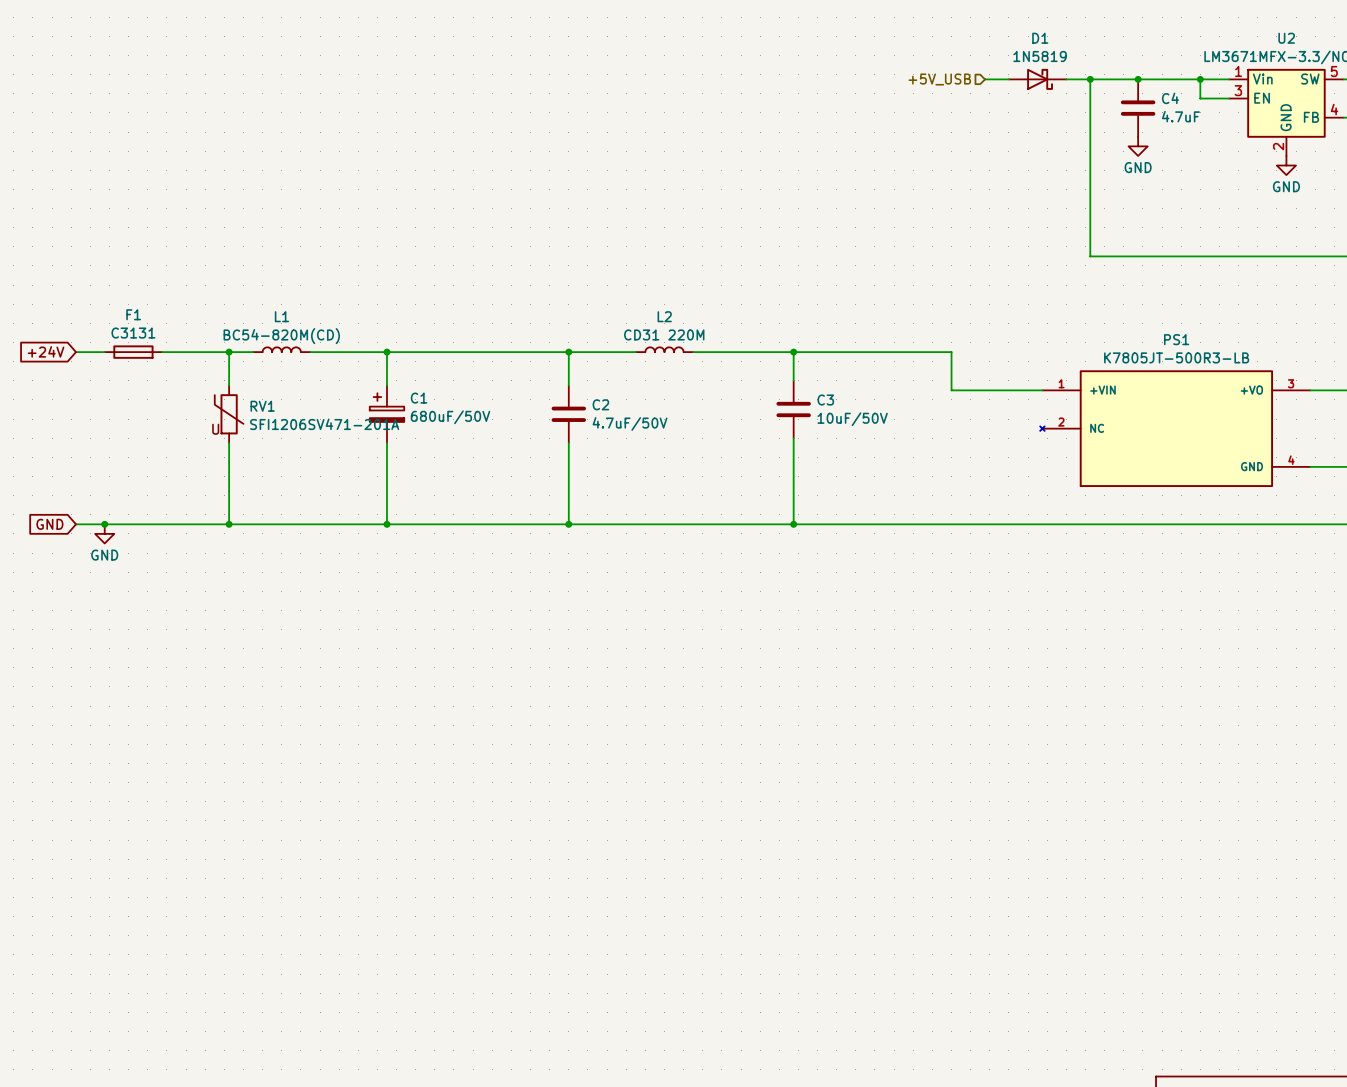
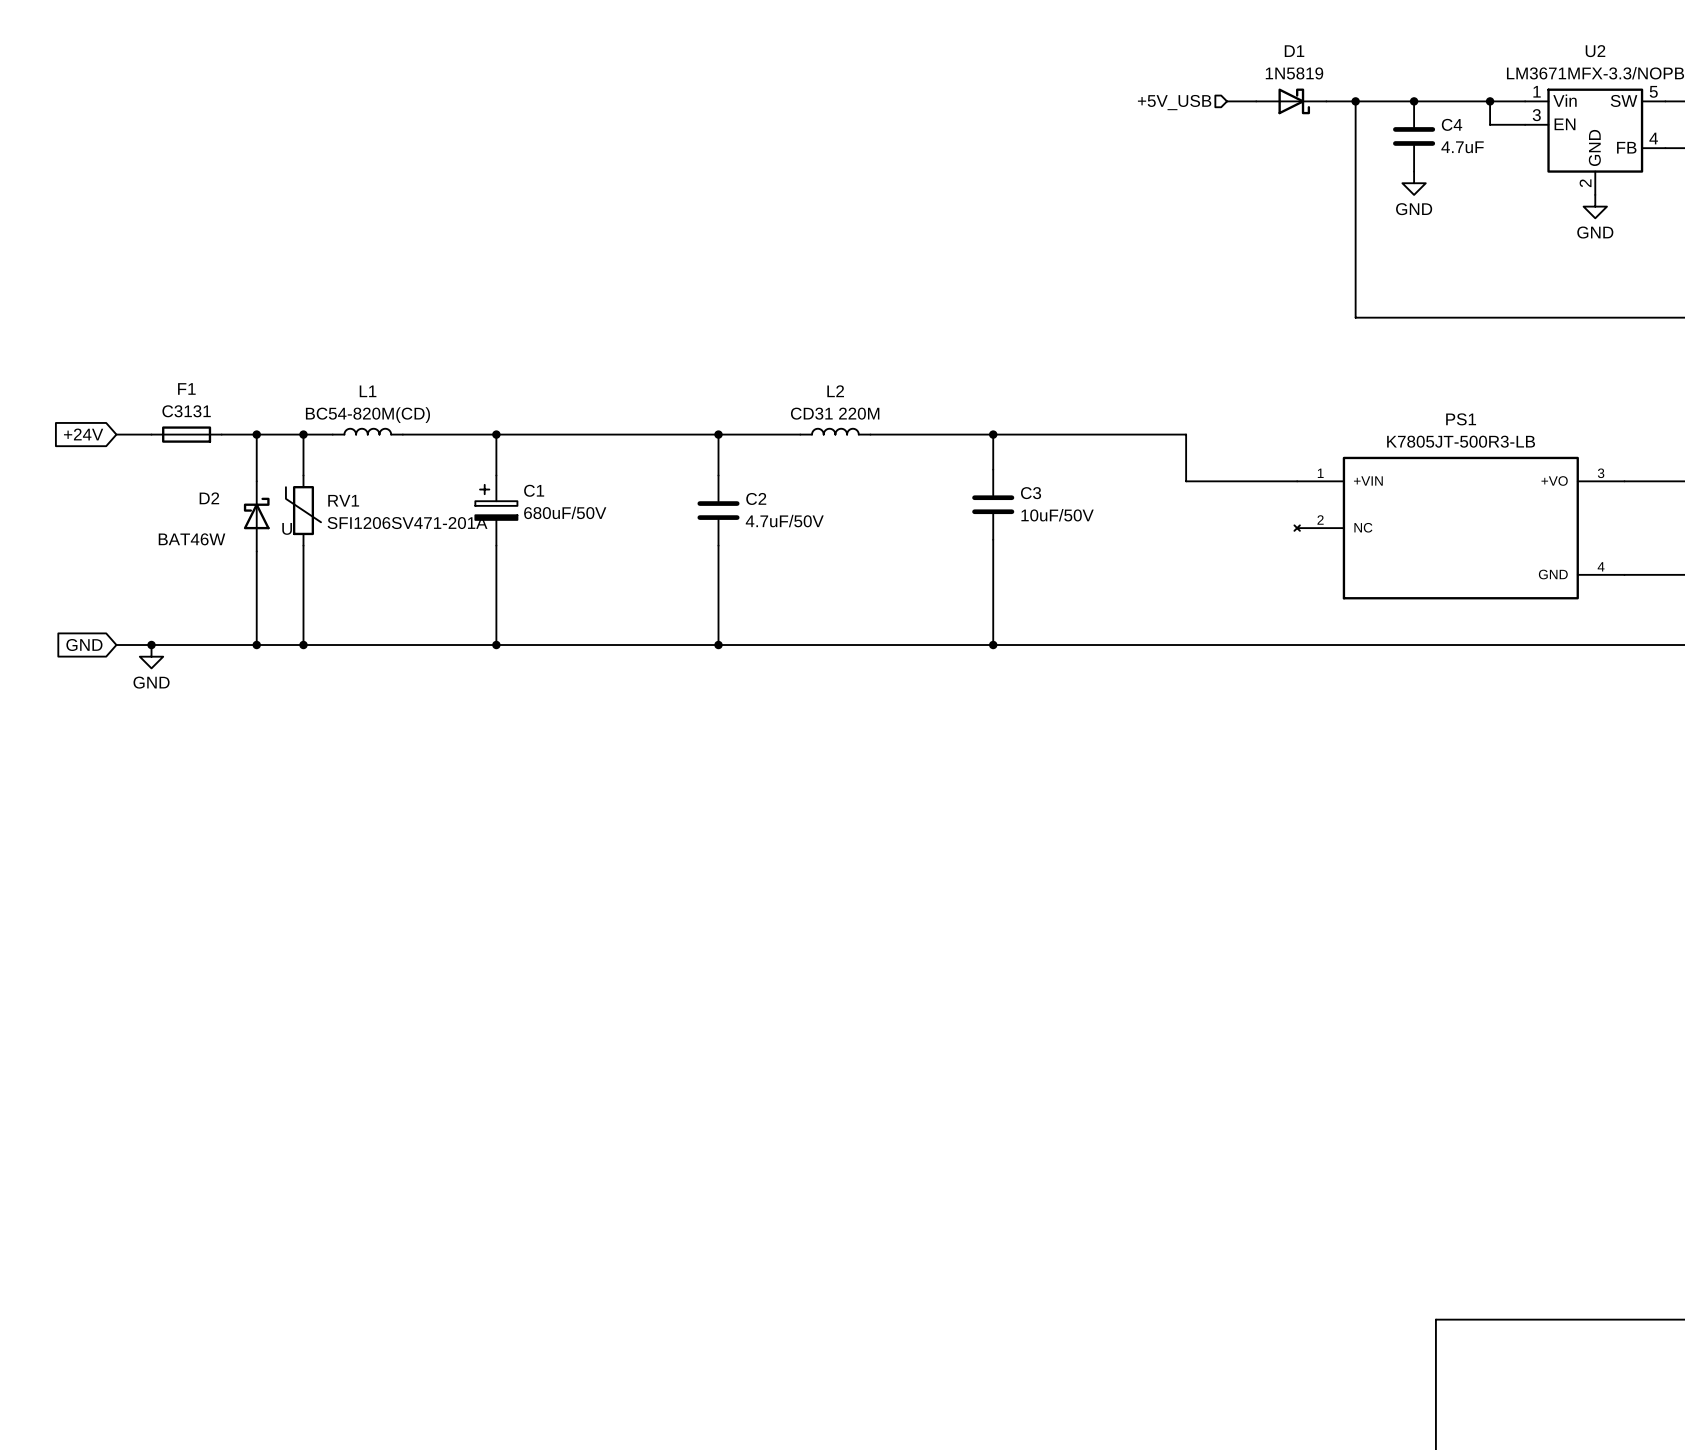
wire: none -> (256, 434) (256, 481)
junction: none -> (256, 434)
D2: none -> BAT46W (256, 516)
wire: none -> (256, 551) (256, 645)
junction: none -> (256, 645)

